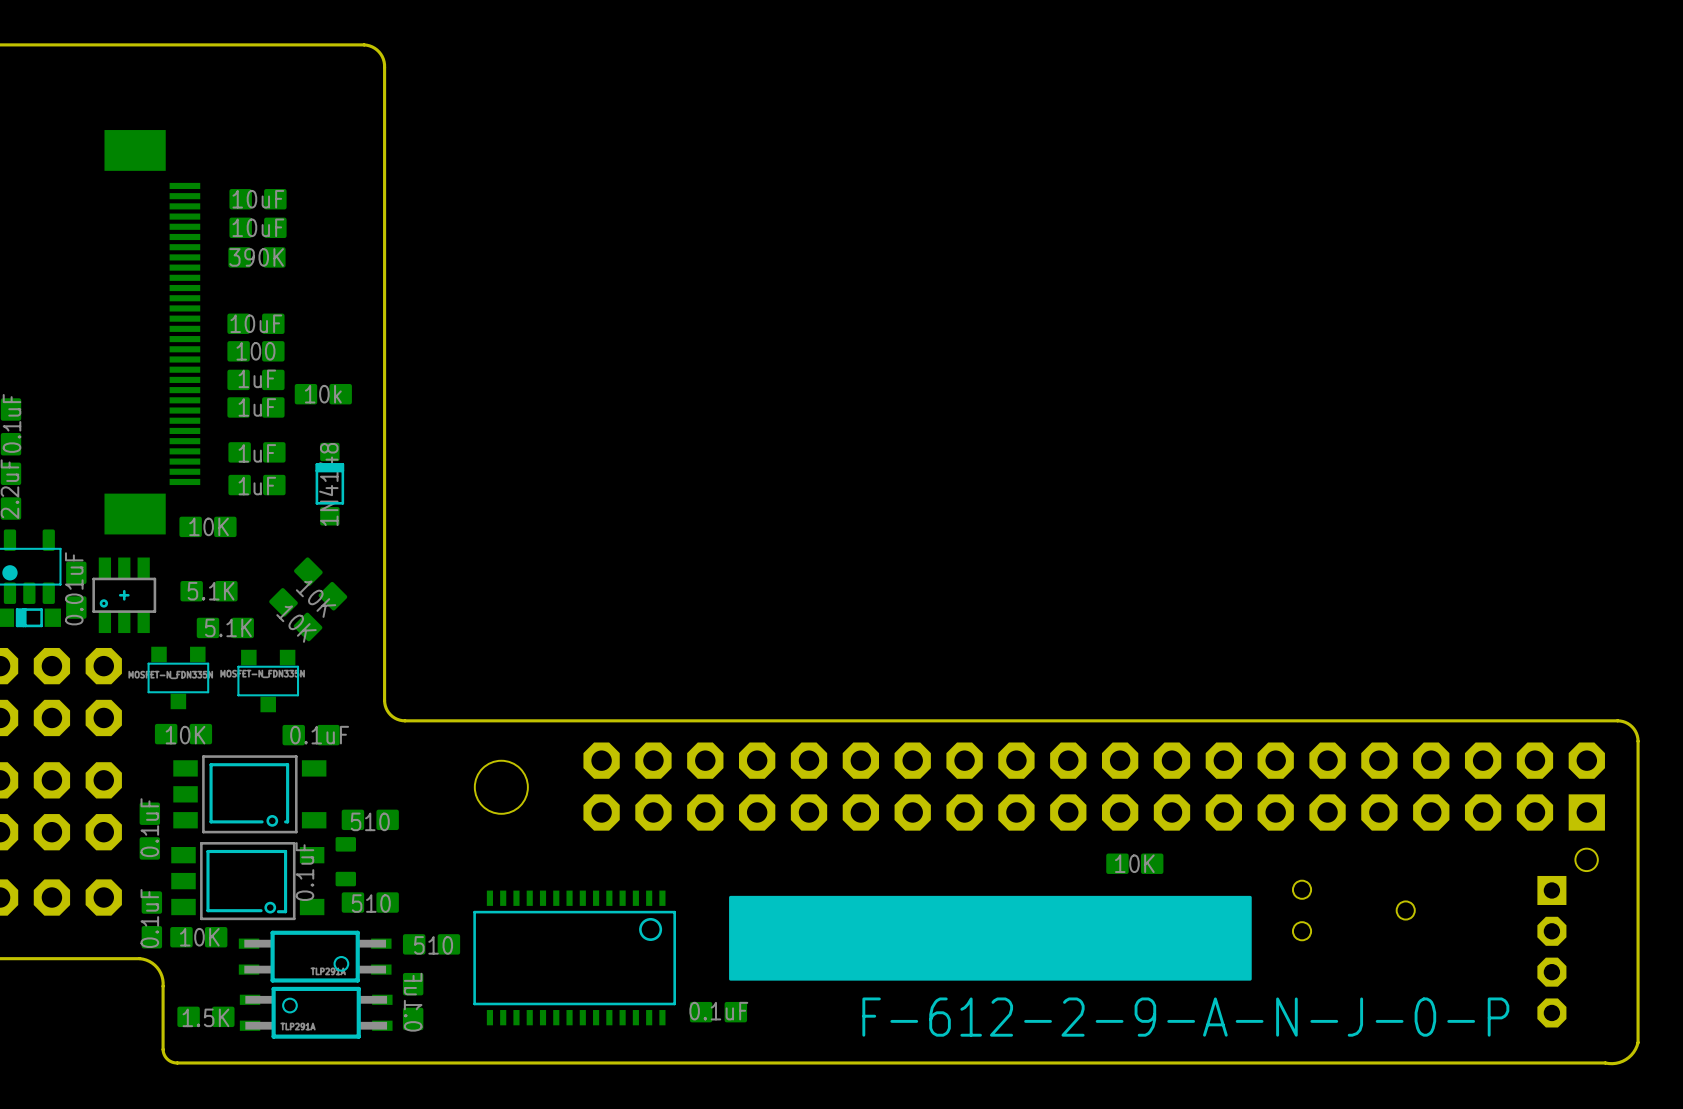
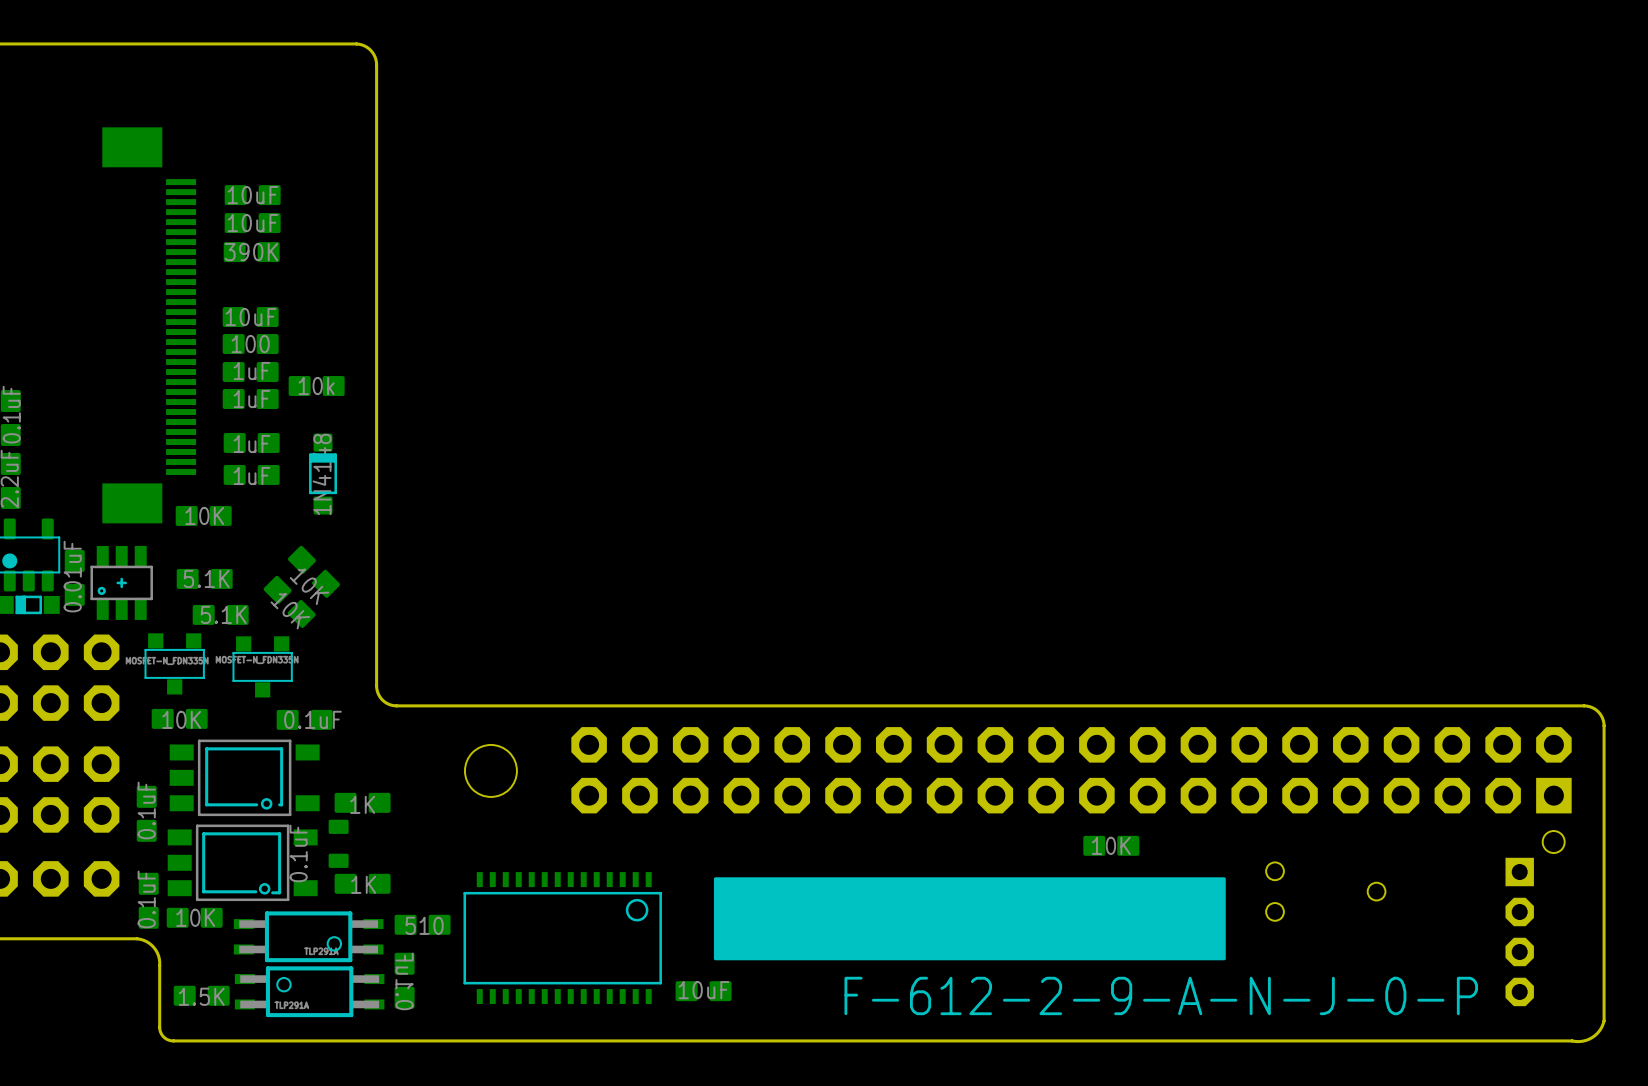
part value: 510 (370, 821) -> 1K (362, 804)
part value: 510 (371, 903) -> 1K (363, 884)
part value: 0.1uF (718, 1011) -> 10uF (703, 990)

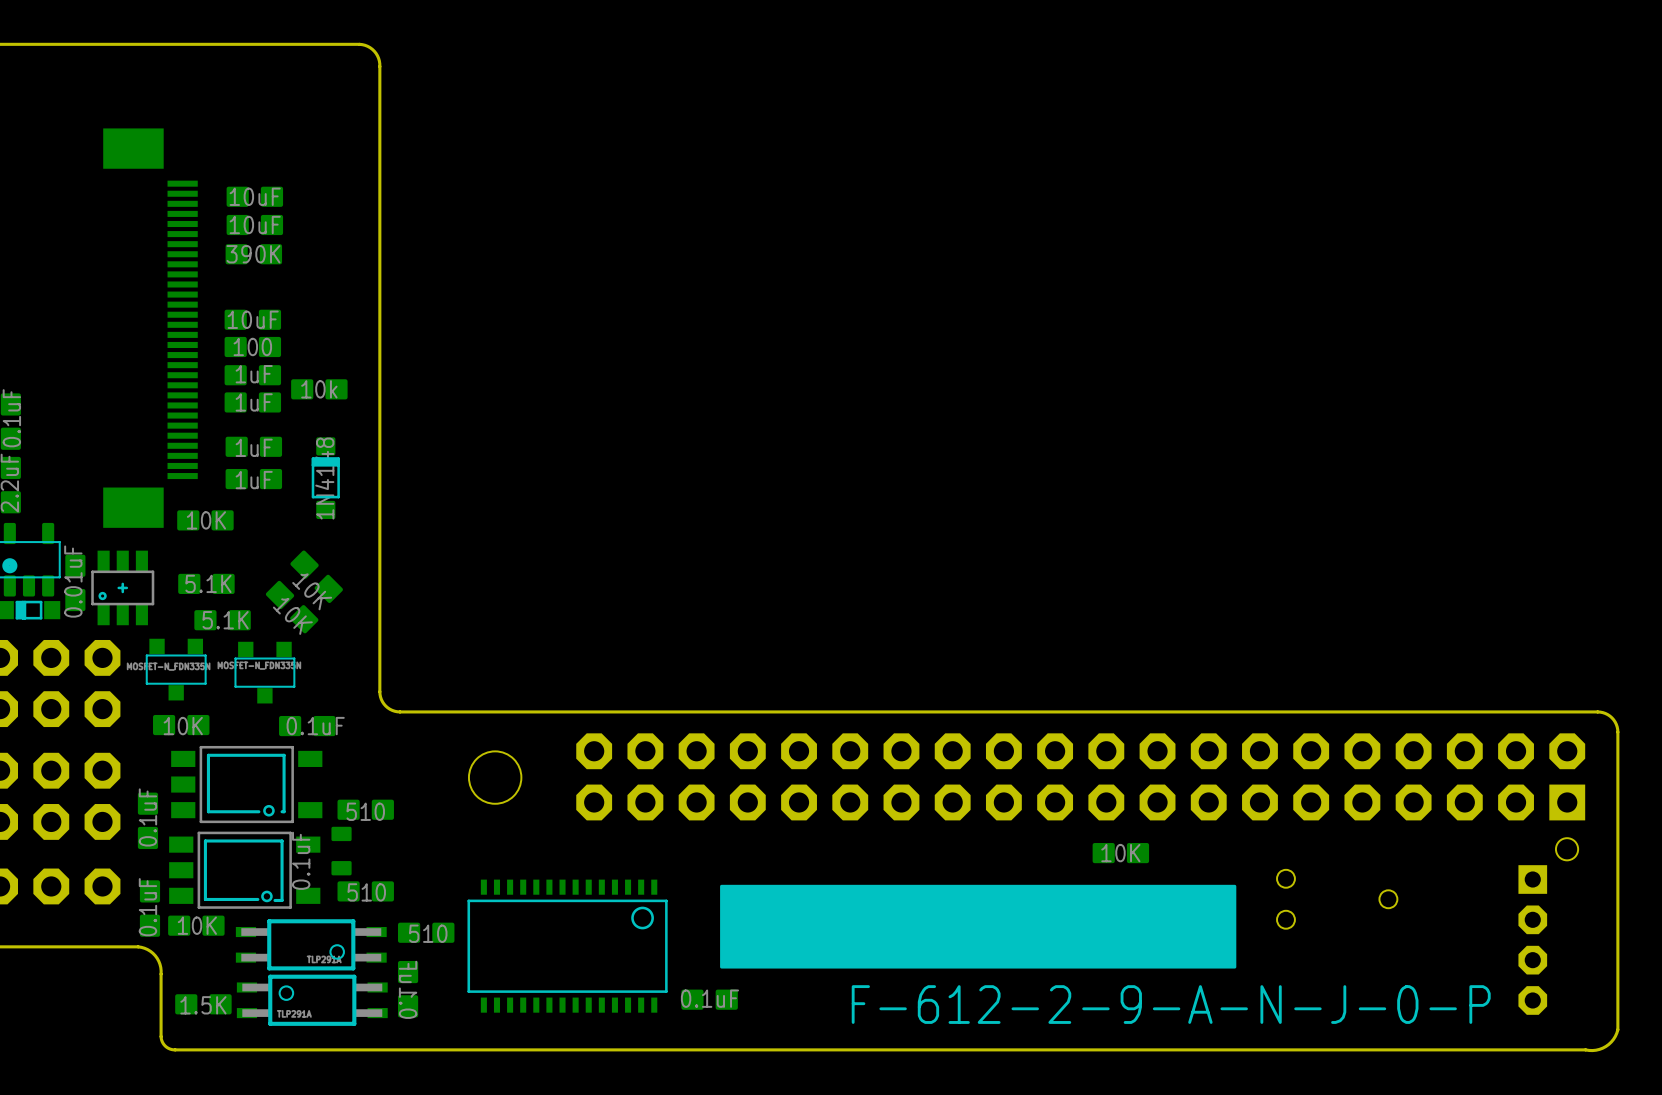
part value: 1K (362, 804) -> 510 (365, 811)
part value: 1K (363, 884) -> 510 (366, 892)
part value: 10uF (703, 990) -> 0.1uF (709, 998)

